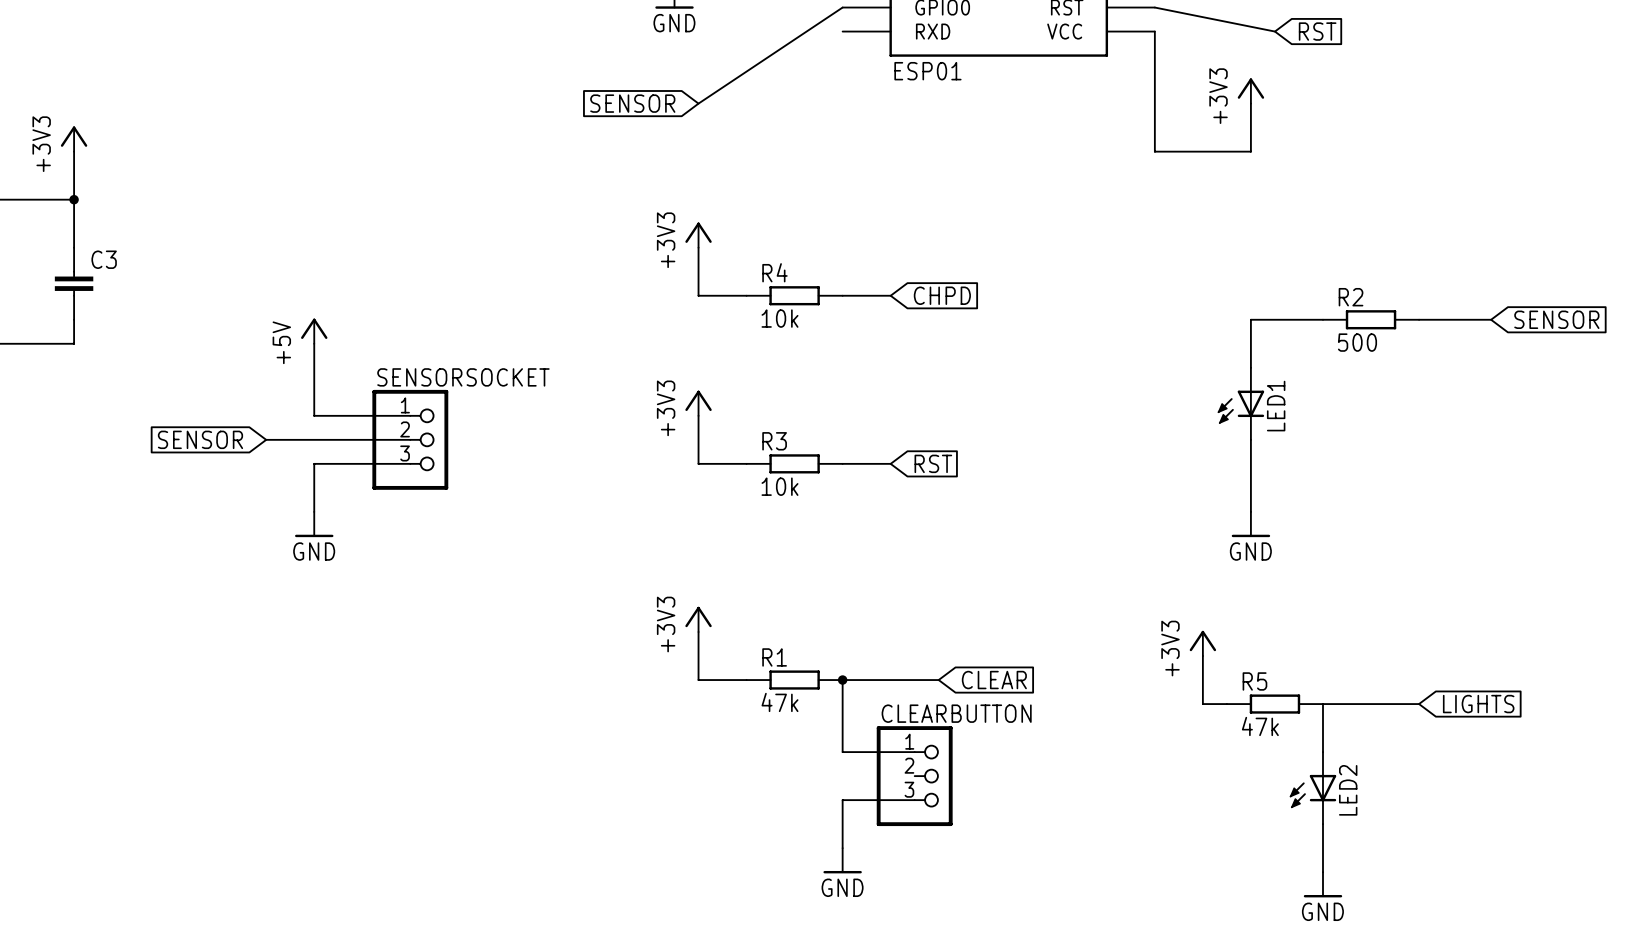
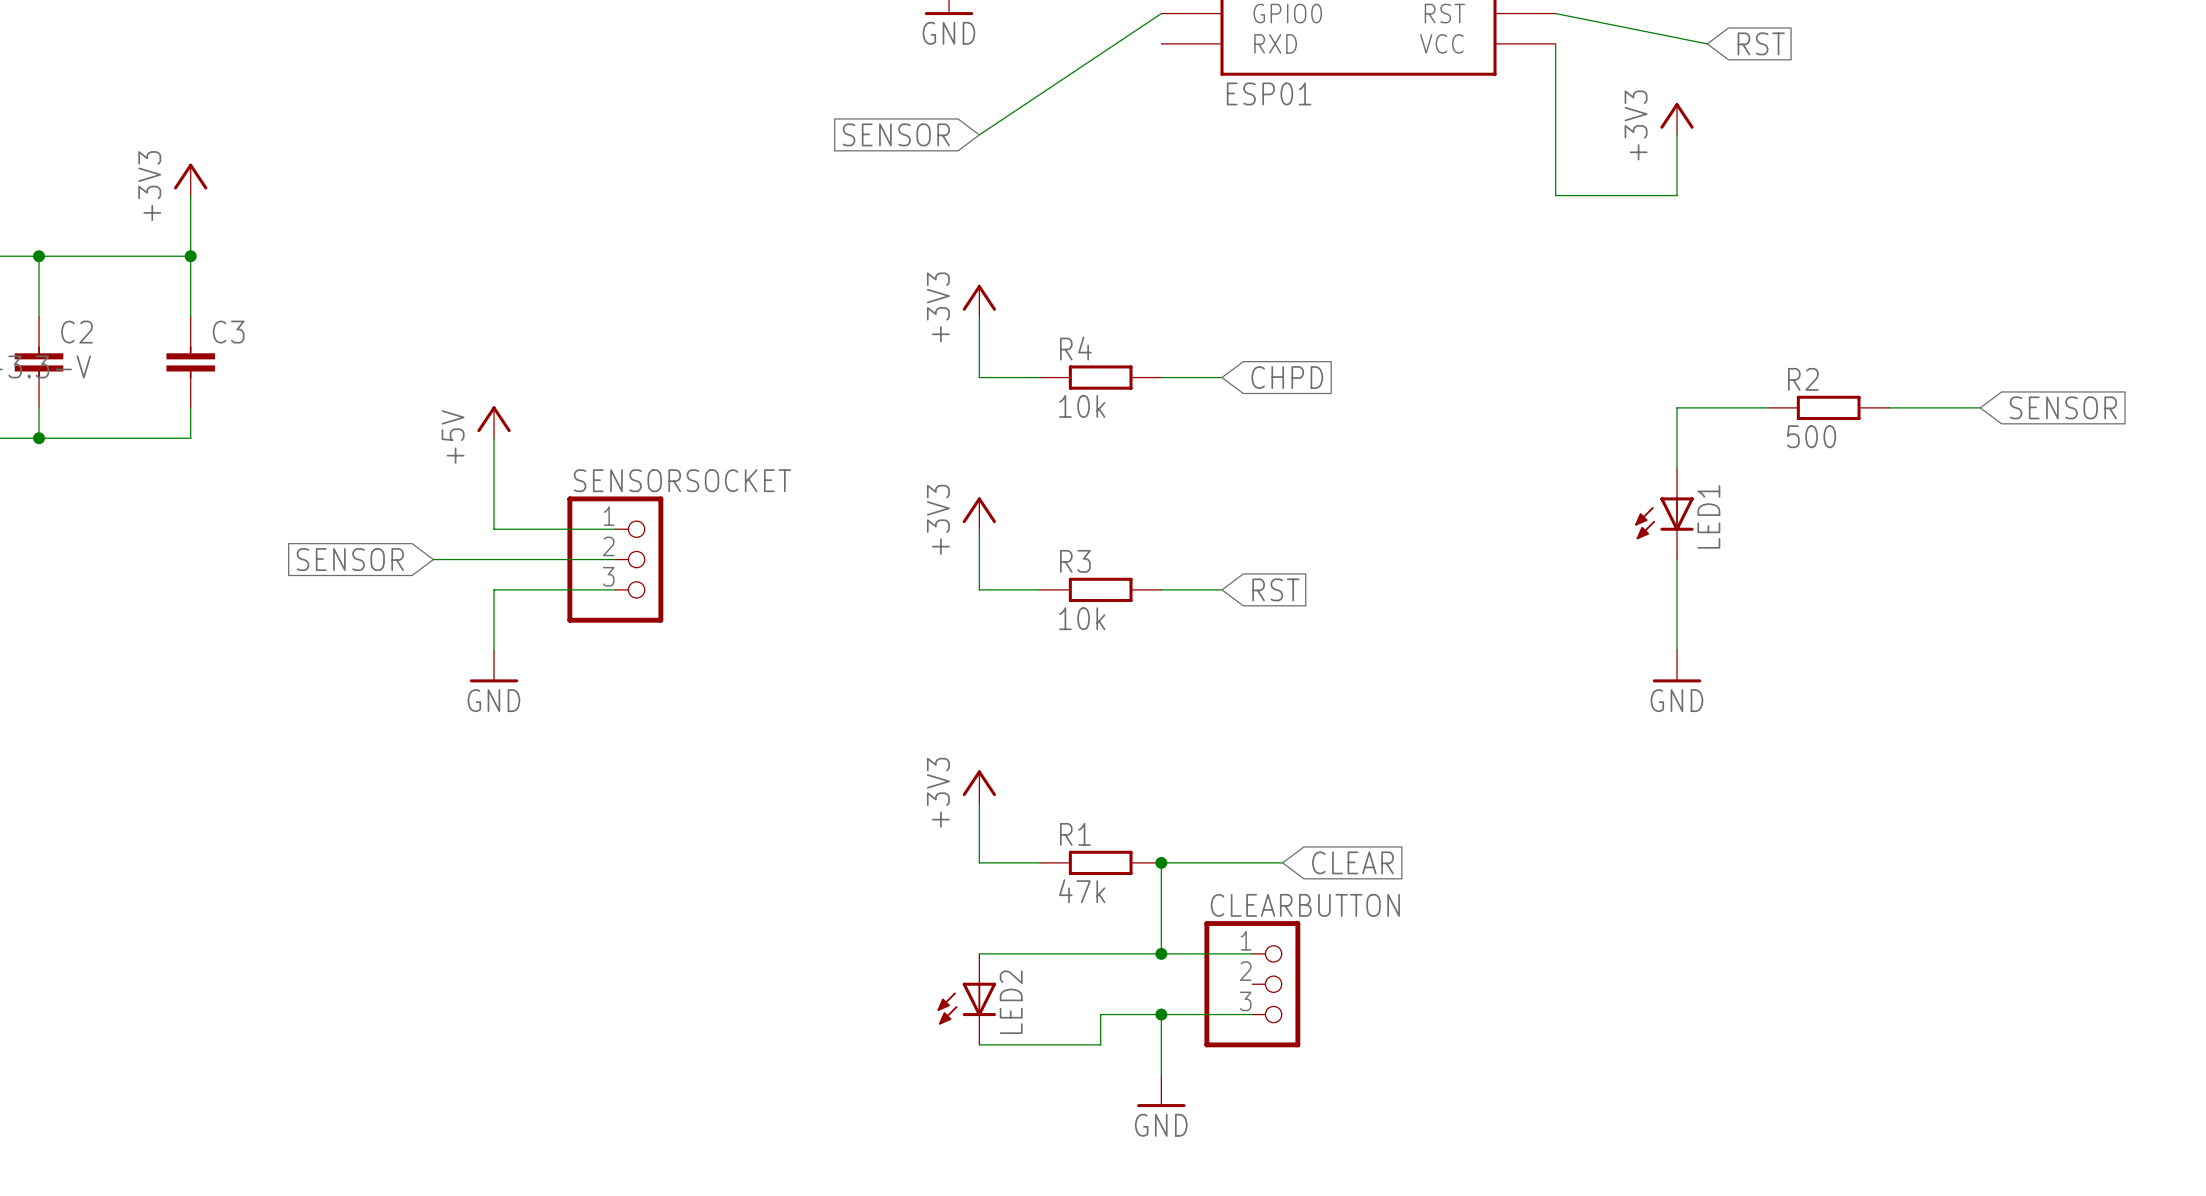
power symbol: +3V3 (1202, 643) -> none
wire: (1202, 656) (1202, 704) (1226, 704) -> none
R5: 47k (1274, 704) -> none
wire: (1419, 704) (1322, 704) (1322, 752) -> none
global label: LIGHTS (1478, 704) -> none
wire: none -> (979, 953) (1161, 953)
junction: none -> (1161, 953)
LED2 position: (1313, 788) -> (966, 999)
wire: none -> (1161, 1014) (1100, 1014) (1100, 1044) (979, 1044)
junction: none -> (1161, 1014)
wire: (1322, 824) (1322, 872) -> none
power symbol: GND (1322, 884) -> none

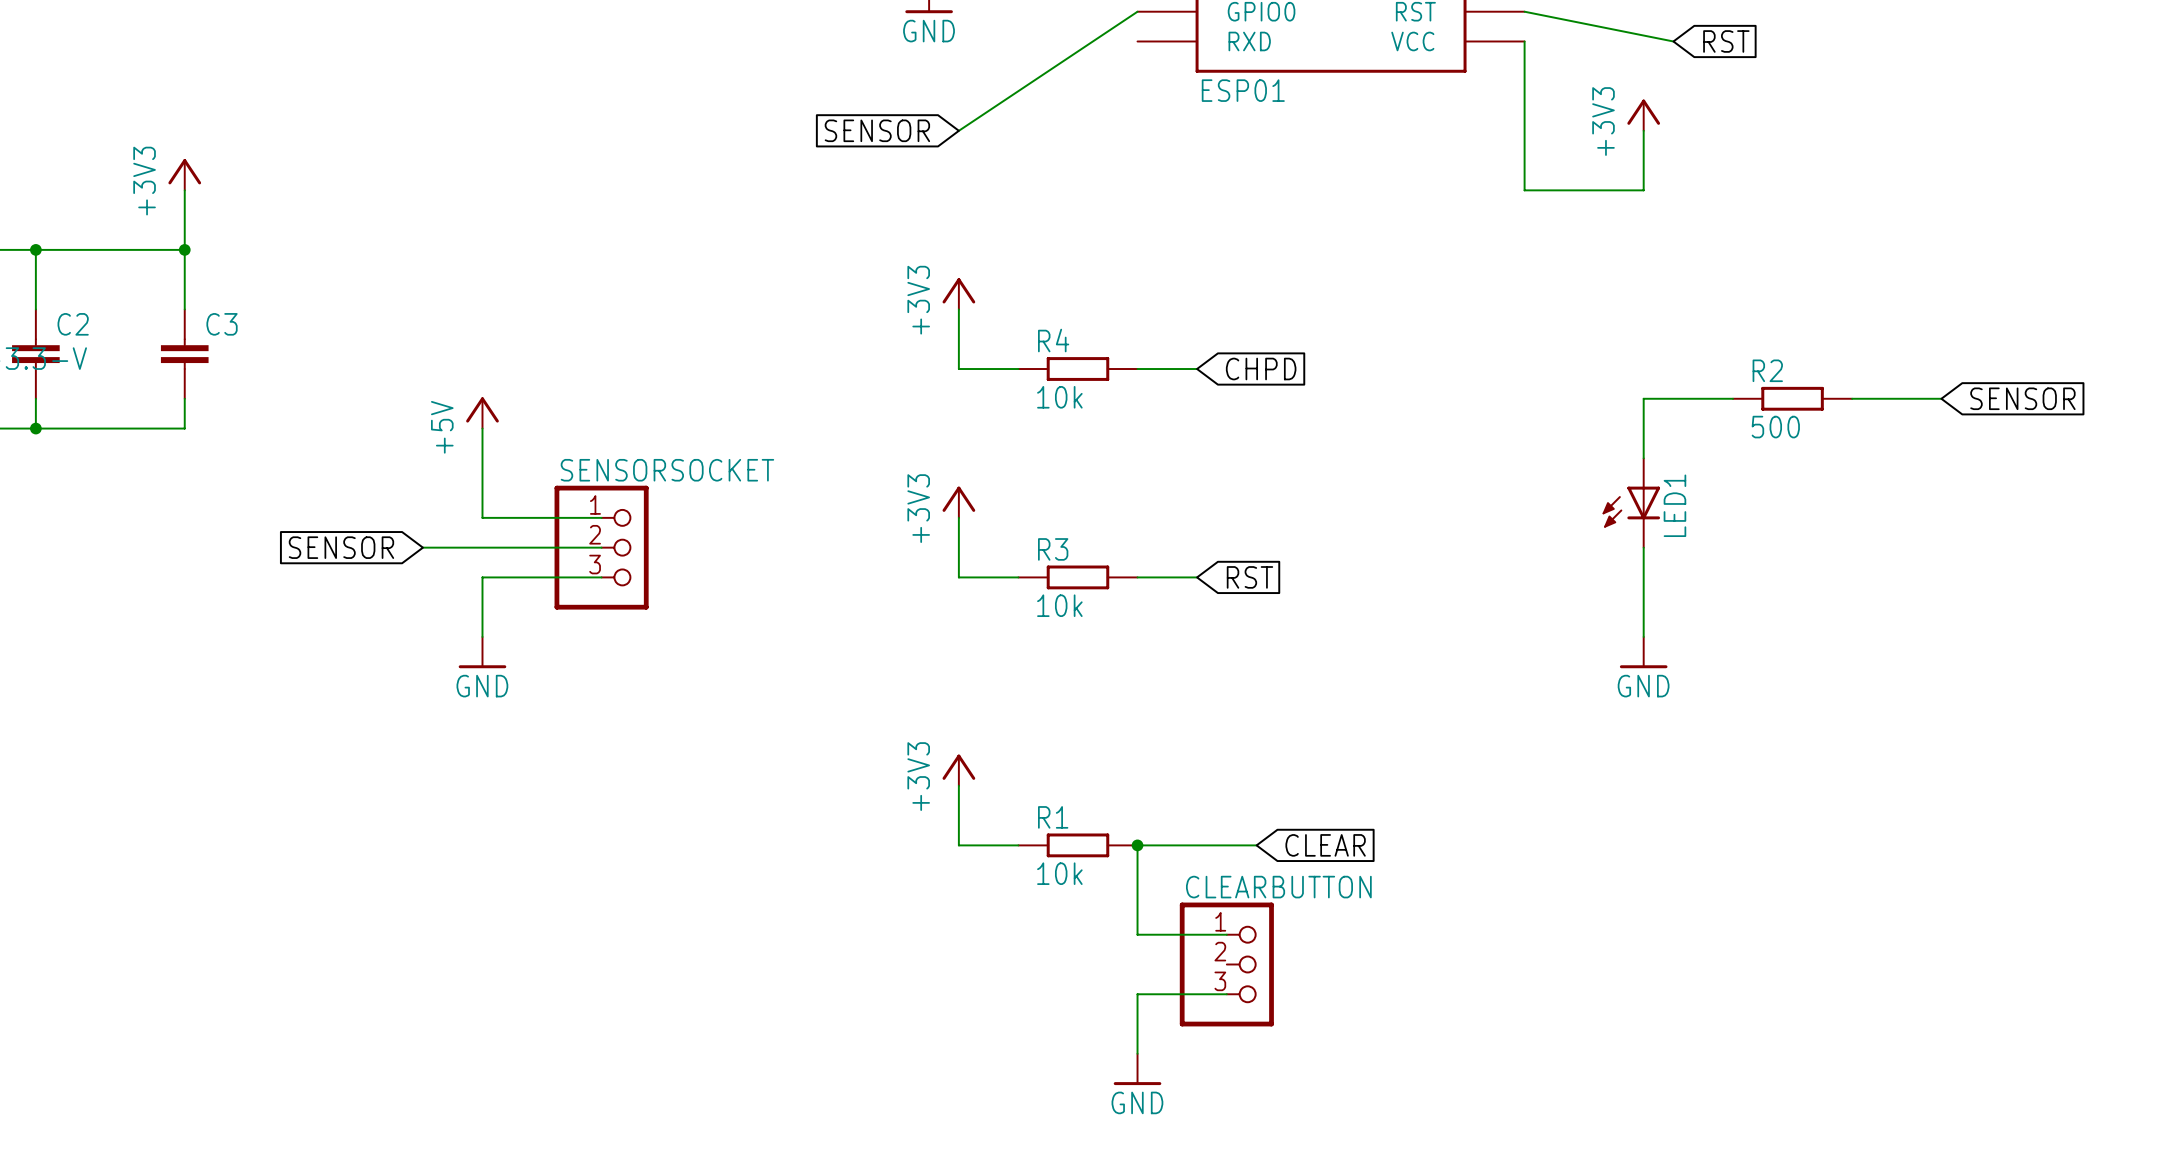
R1 value: 47k (1082, 891) -> 10k (1059, 873)
wire: (979, 953) (1161, 953) -> none
junction: (1161, 953) -> none
LED2: (966, 999) -> none
wire: (1161, 1014) (1100, 1014) (1100, 1044) (979, 1044) -> none
junction: (1161, 1014) -> none

